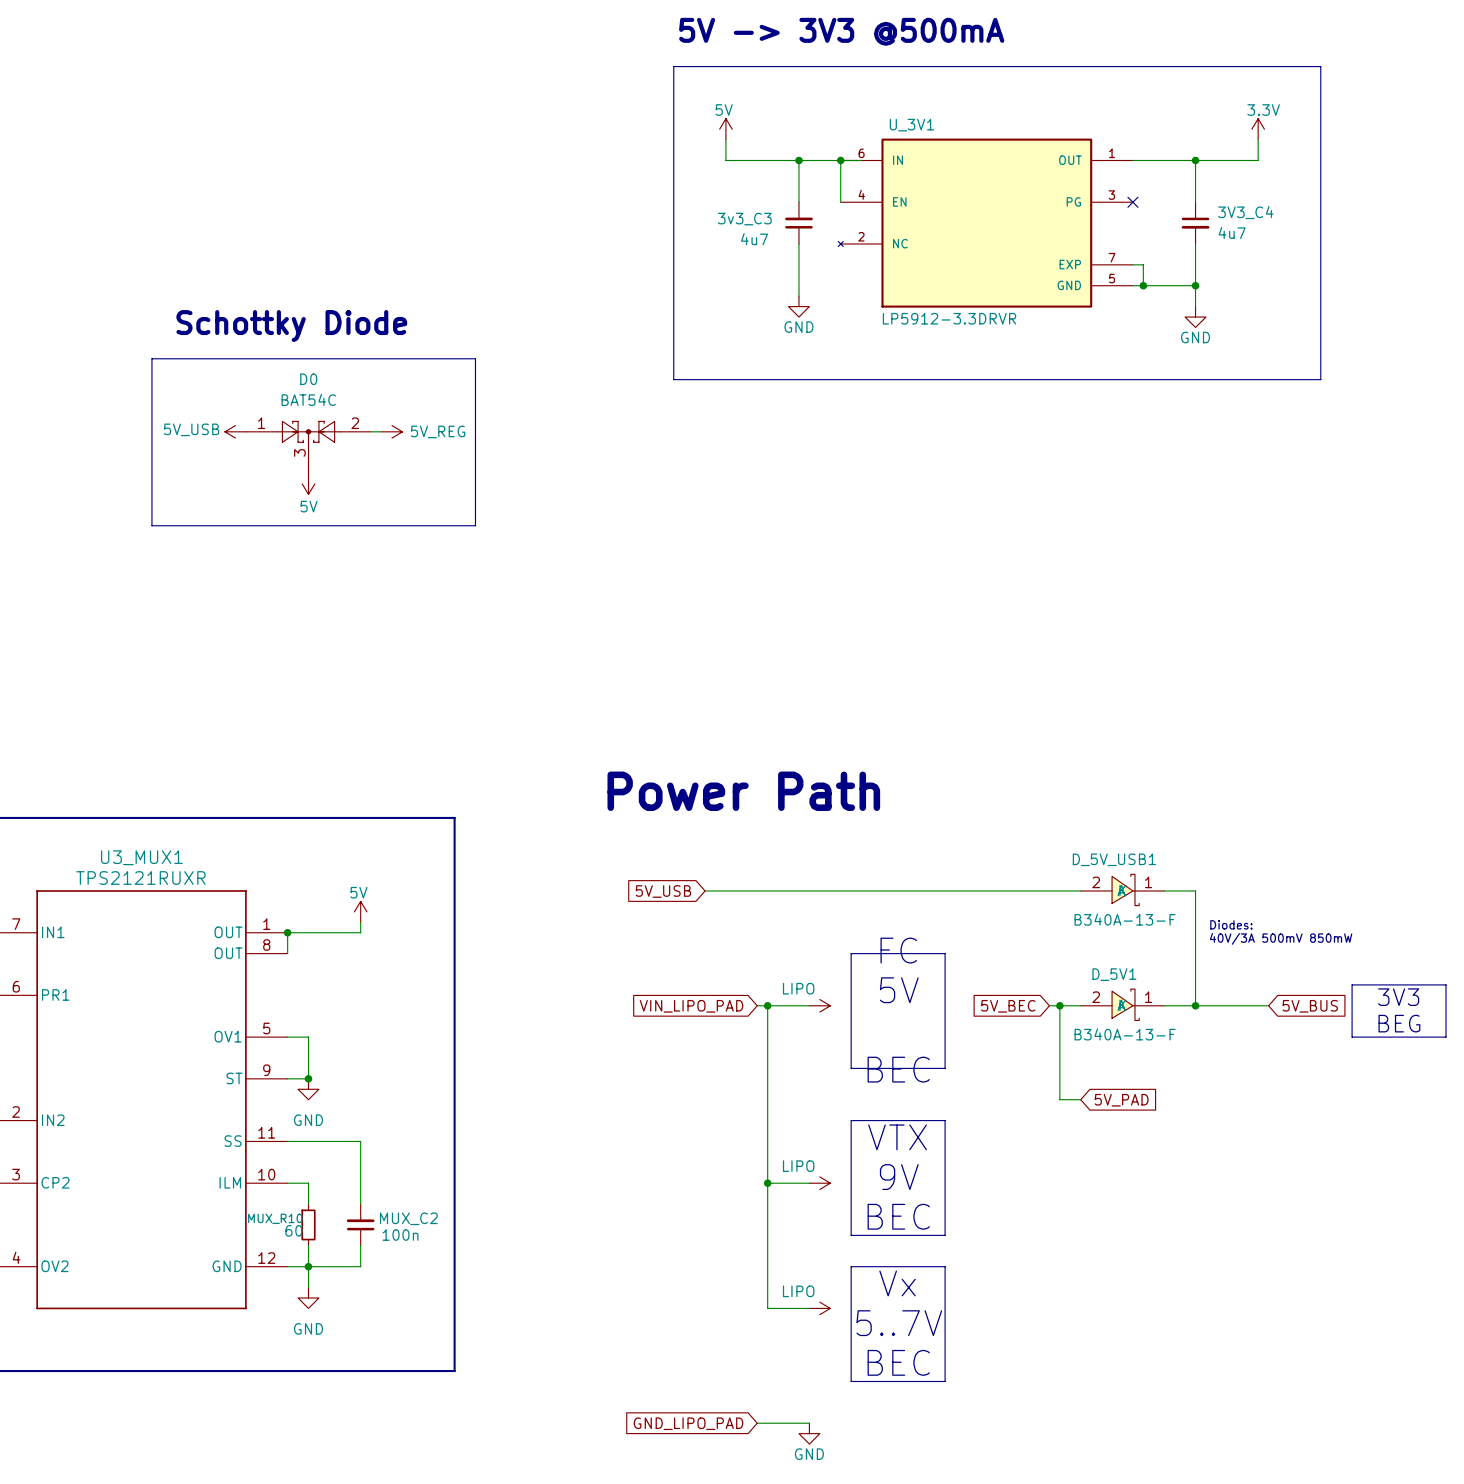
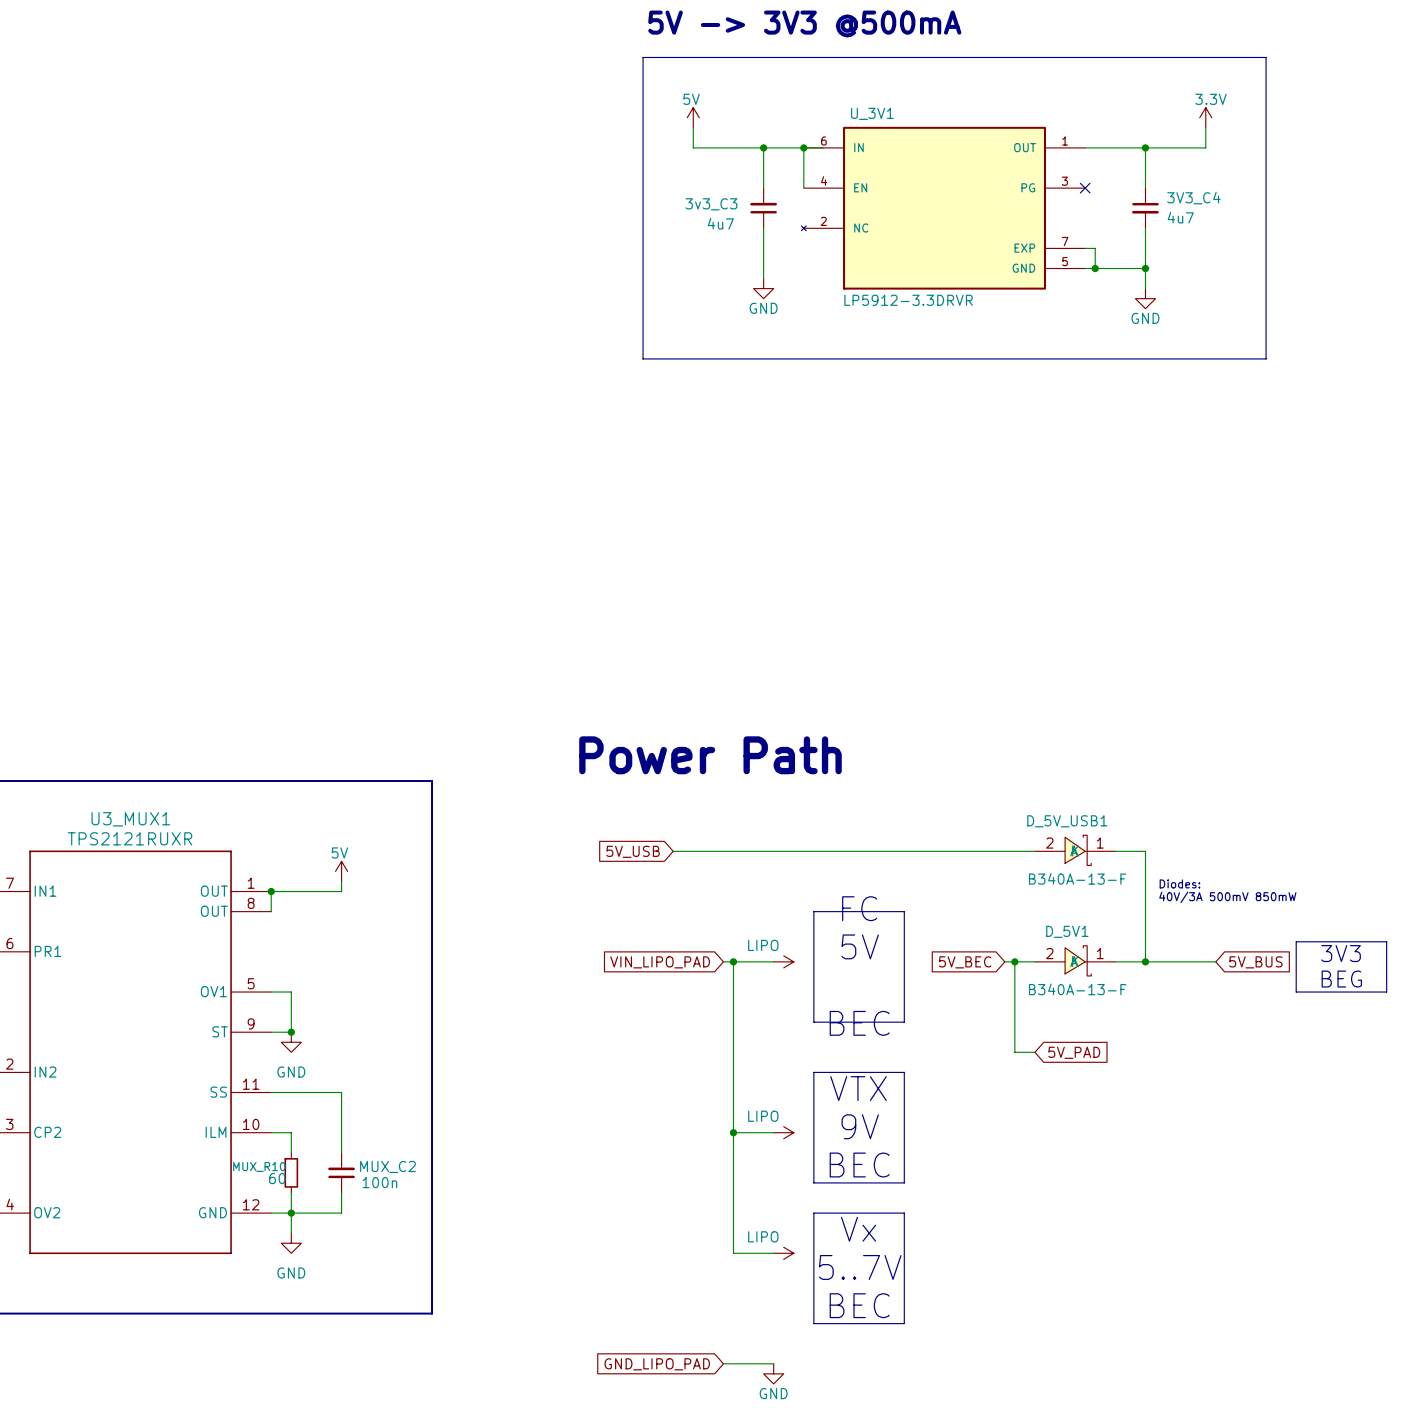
text: Schottky Diode (291, 326) -> none
line: (151, 358) (475, 358) (475, 525) (151, 525) (151, 358) -> none
power symbol: 5V_USB (235, 431) -> none
wire: (371, 431) (381, 431) -> none
power symbol: 5V_REG (391, 431) -> none
D0: BAT54C (308, 447) -> none
power symbol: 5V (308, 484) -> none

